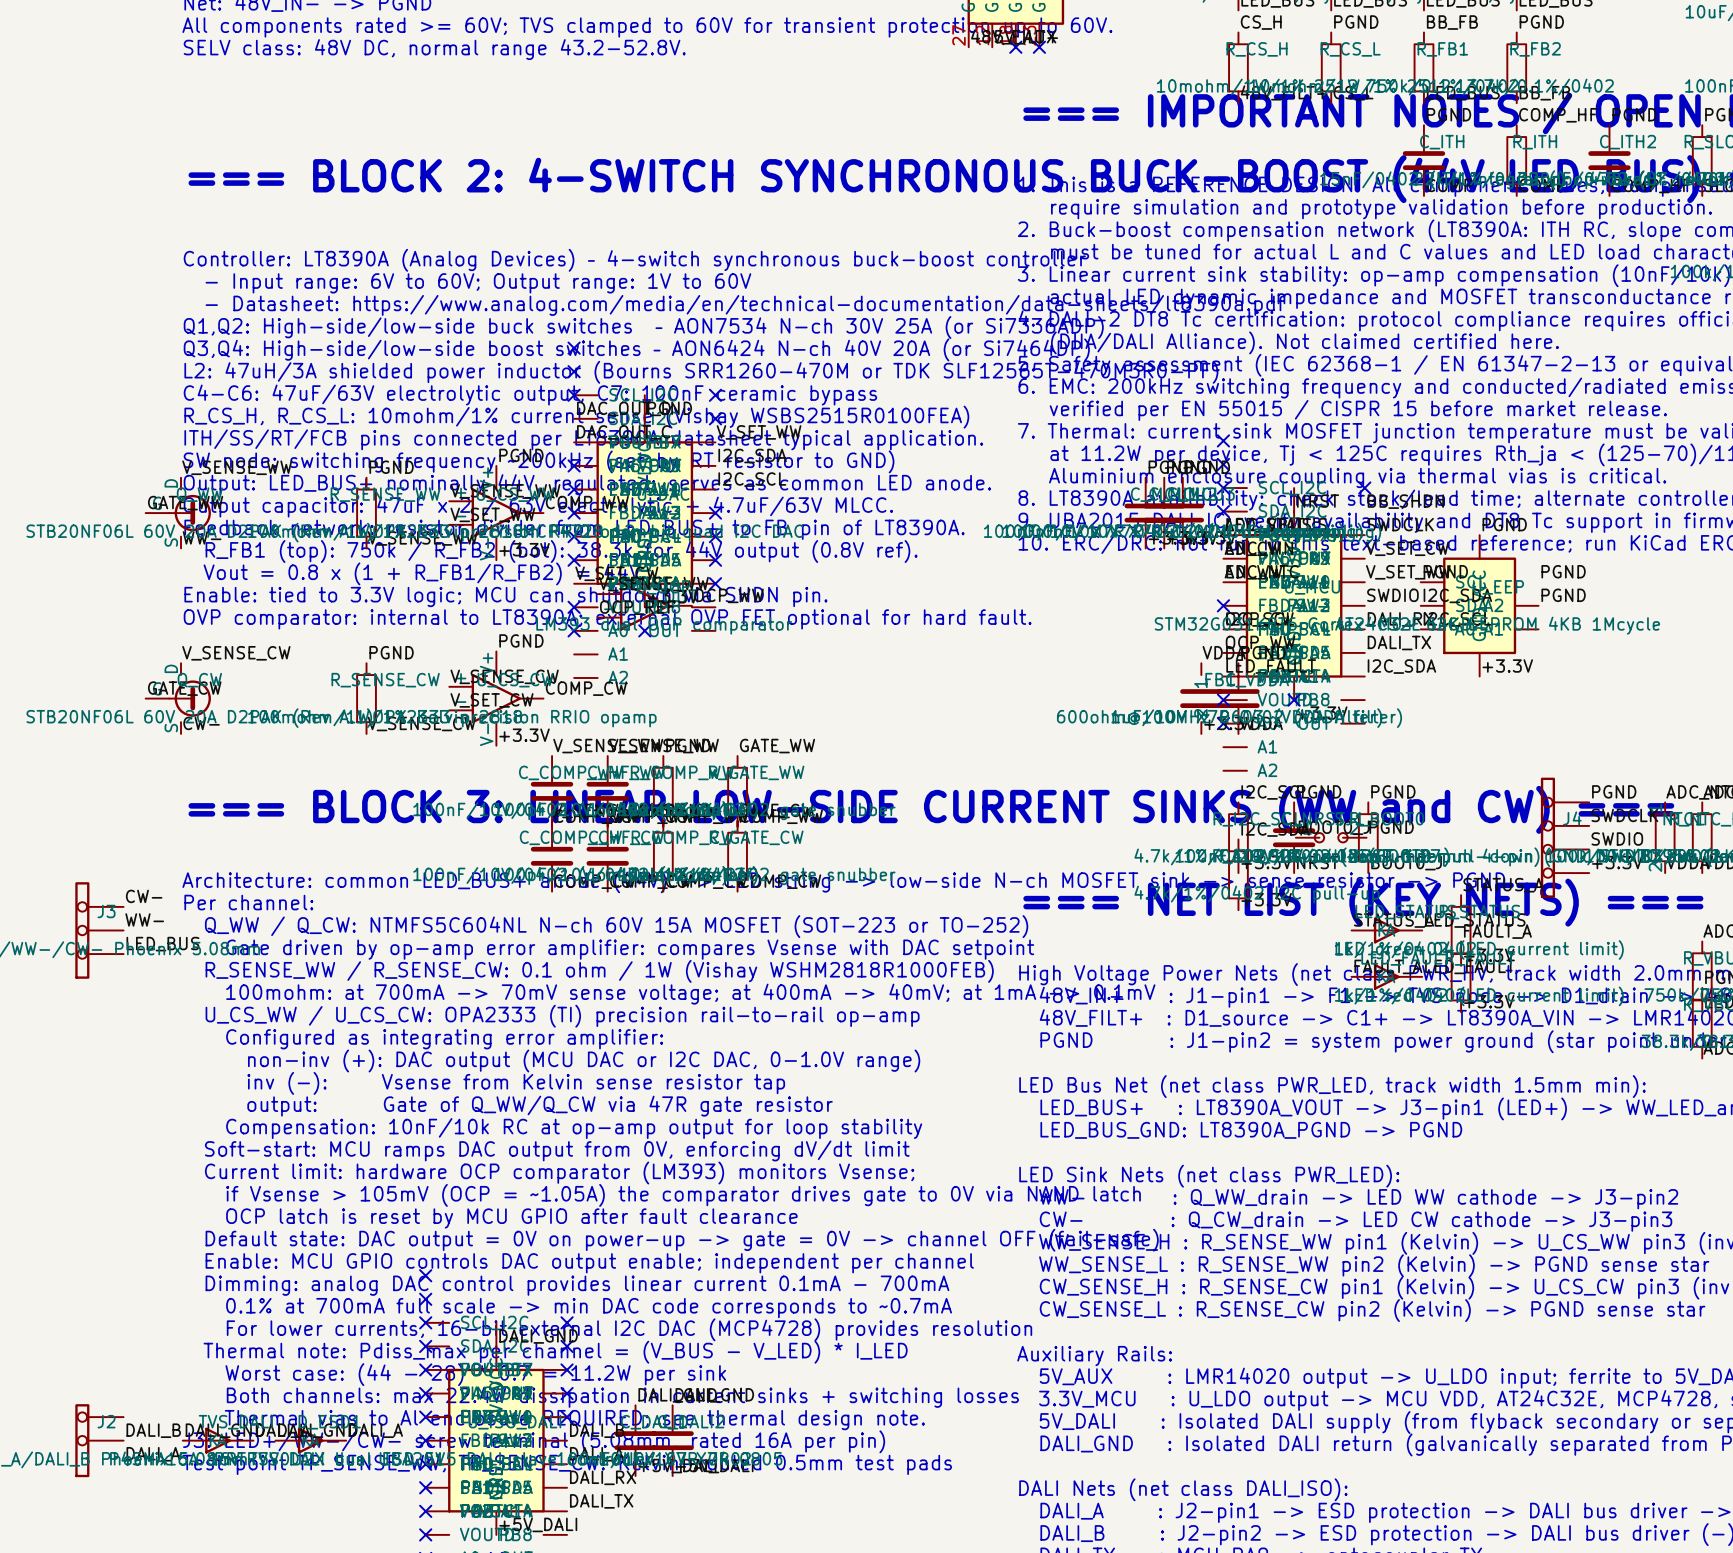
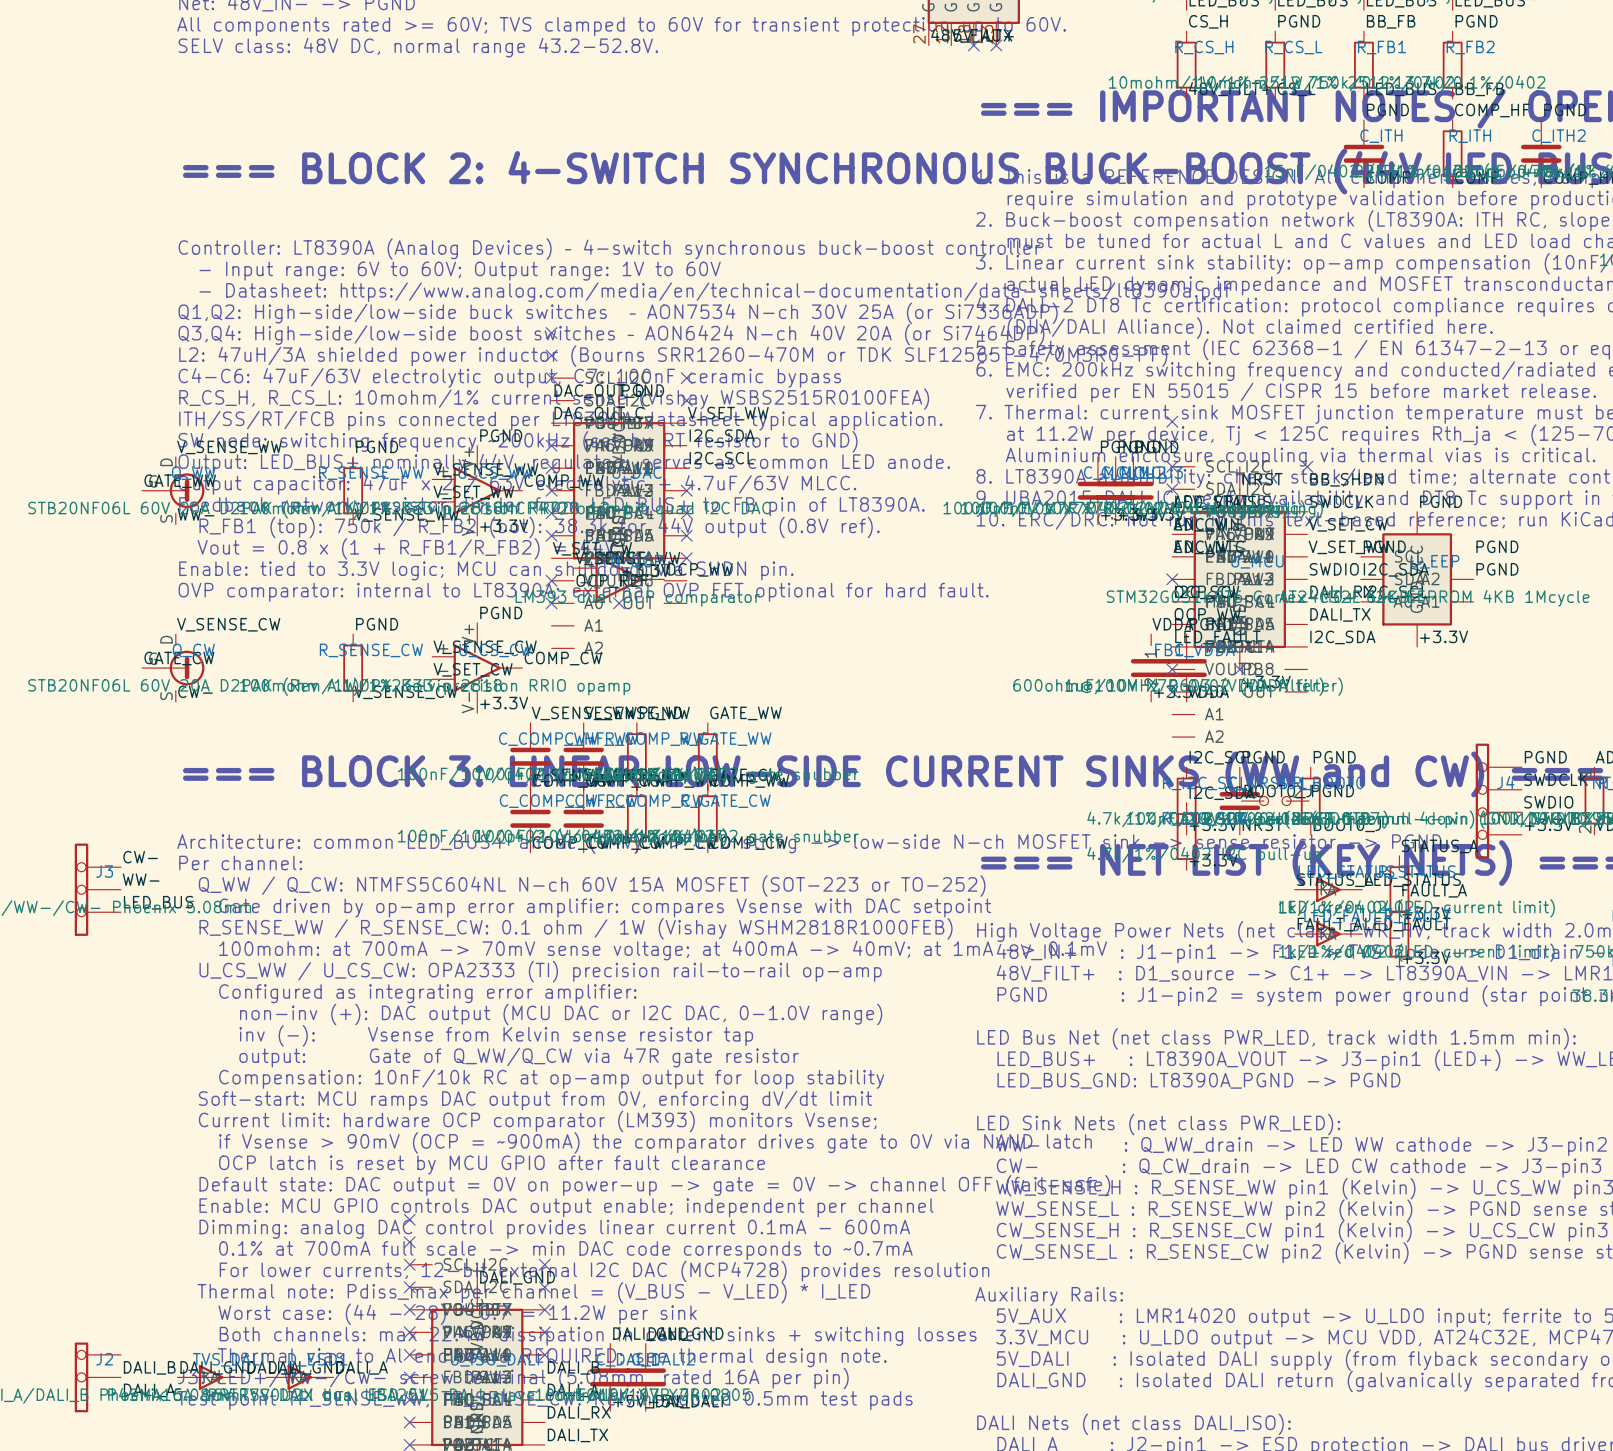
text: if Vsense > 105mV (OCP = ~1.05A) the comparator drives gate to 0V via NAND latch (683, 1195) -> if Vsense > 90mV (OCP = ~900mA) the comparator drives gate to 0V via NAND latch (655, 1142)
text: Dimming: analog DAC control provides linear current 0.1mA - 700mA (577, 1285) -> Dimming: analog DAC control provides linear current 0.1mA - 600mA (554, 1229)
text: For lower currents, 16-bit external I2C DAC (MCP4728) provides resolution (629, 1329) -> For lower currents, 12-bit external I2C DAC (MCP4728) provides resolution (604, 1271)

